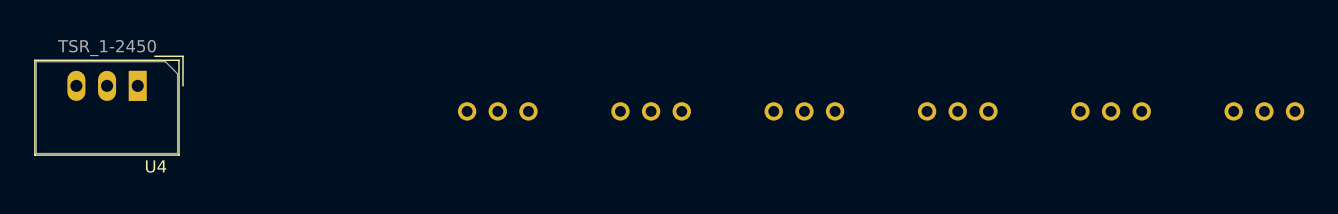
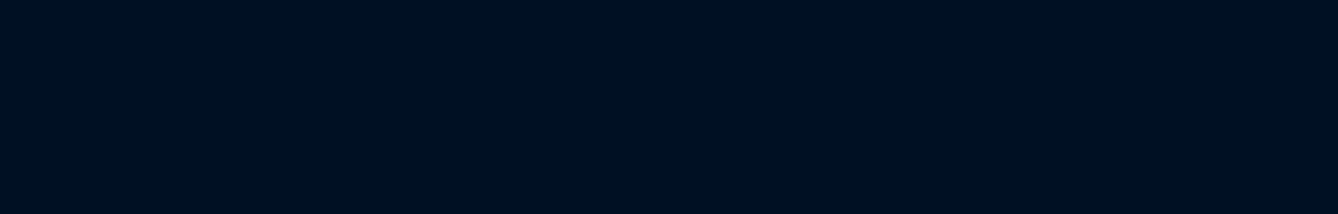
U4: TSR_1-2450 (108, 105) -> none
part: (497, 111) -> none
part: (651, 111) -> none
part: (804, 111) -> none
part: (957, 111) -> none
part: (1111, 111) -> none
part: (1264, 111) -> none

